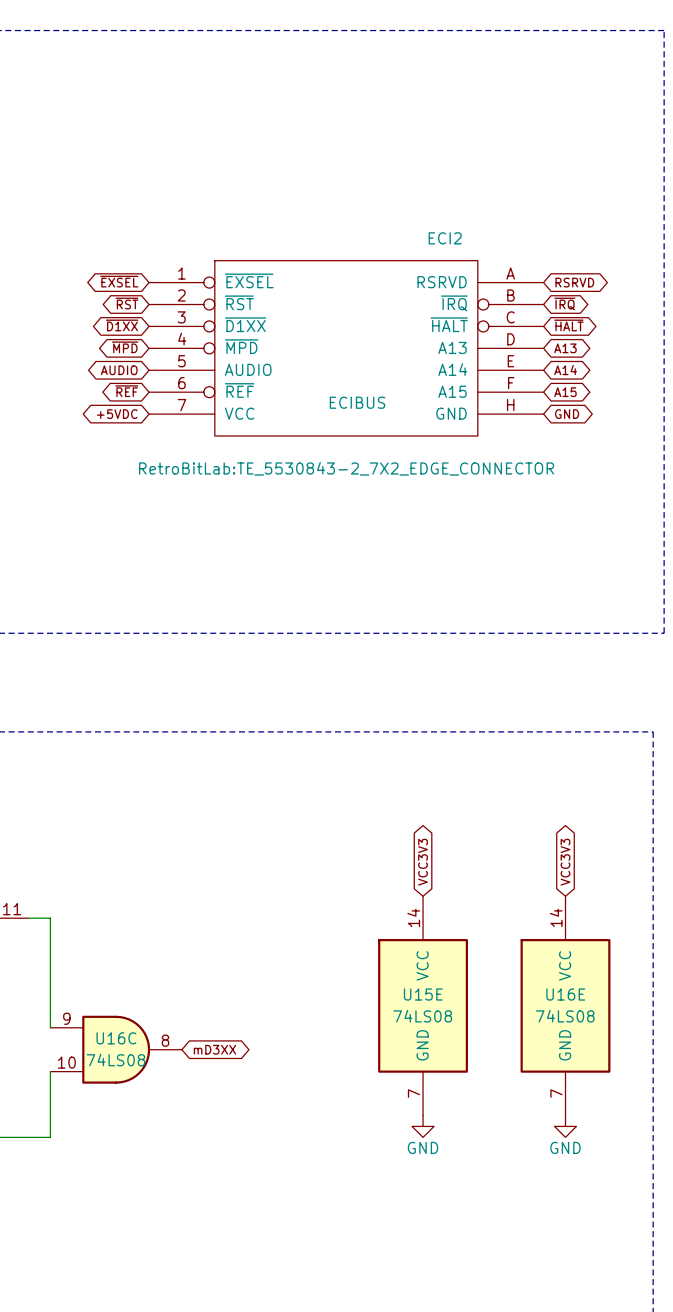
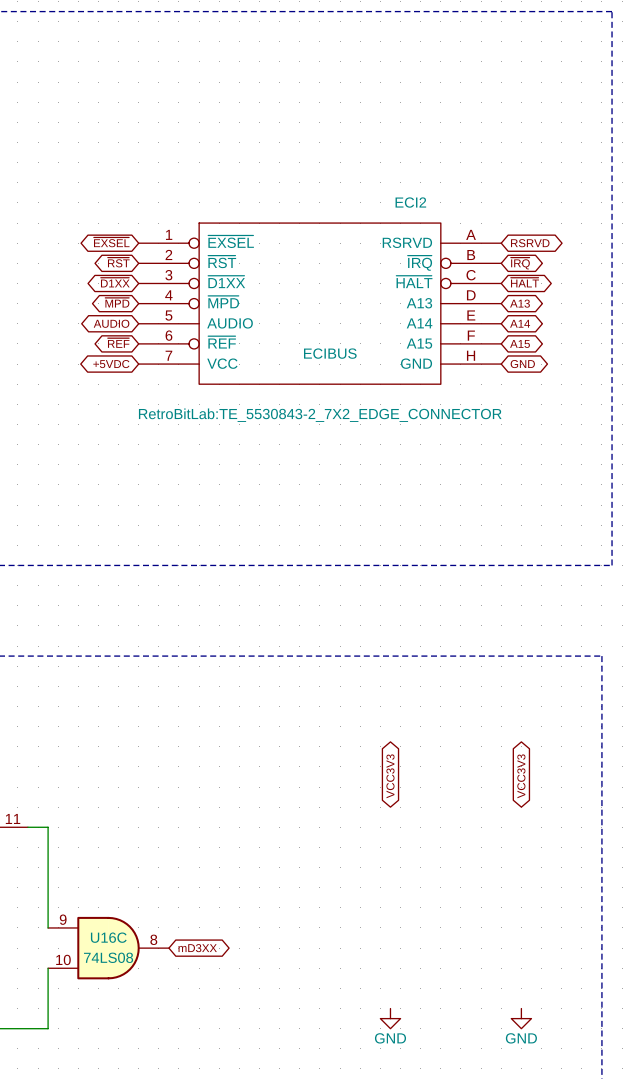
U15E: 74LS08 (423, 1005) -> none
U16E: 74LS08 (565, 1005) -> none

